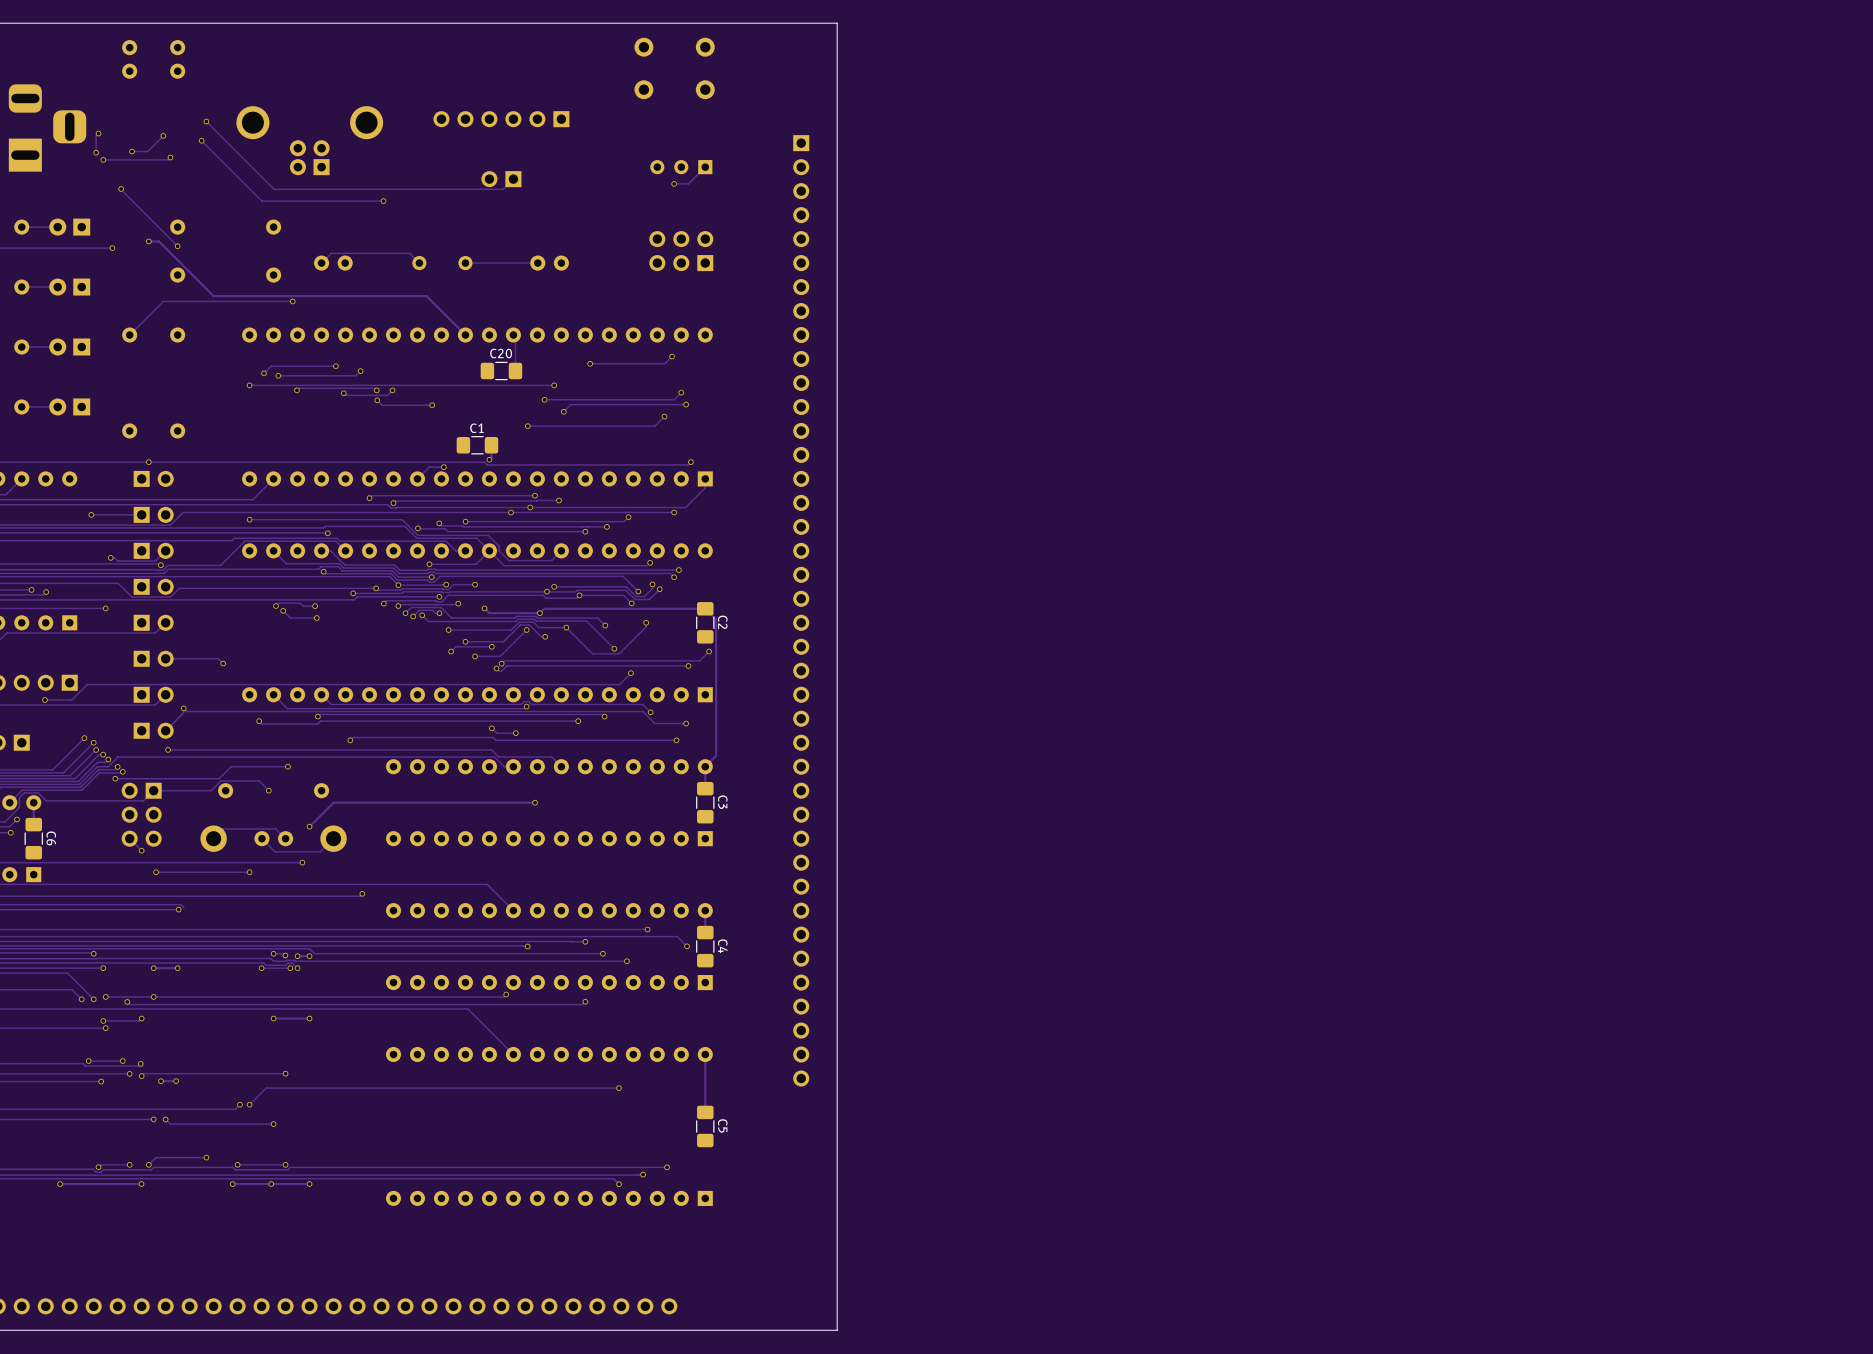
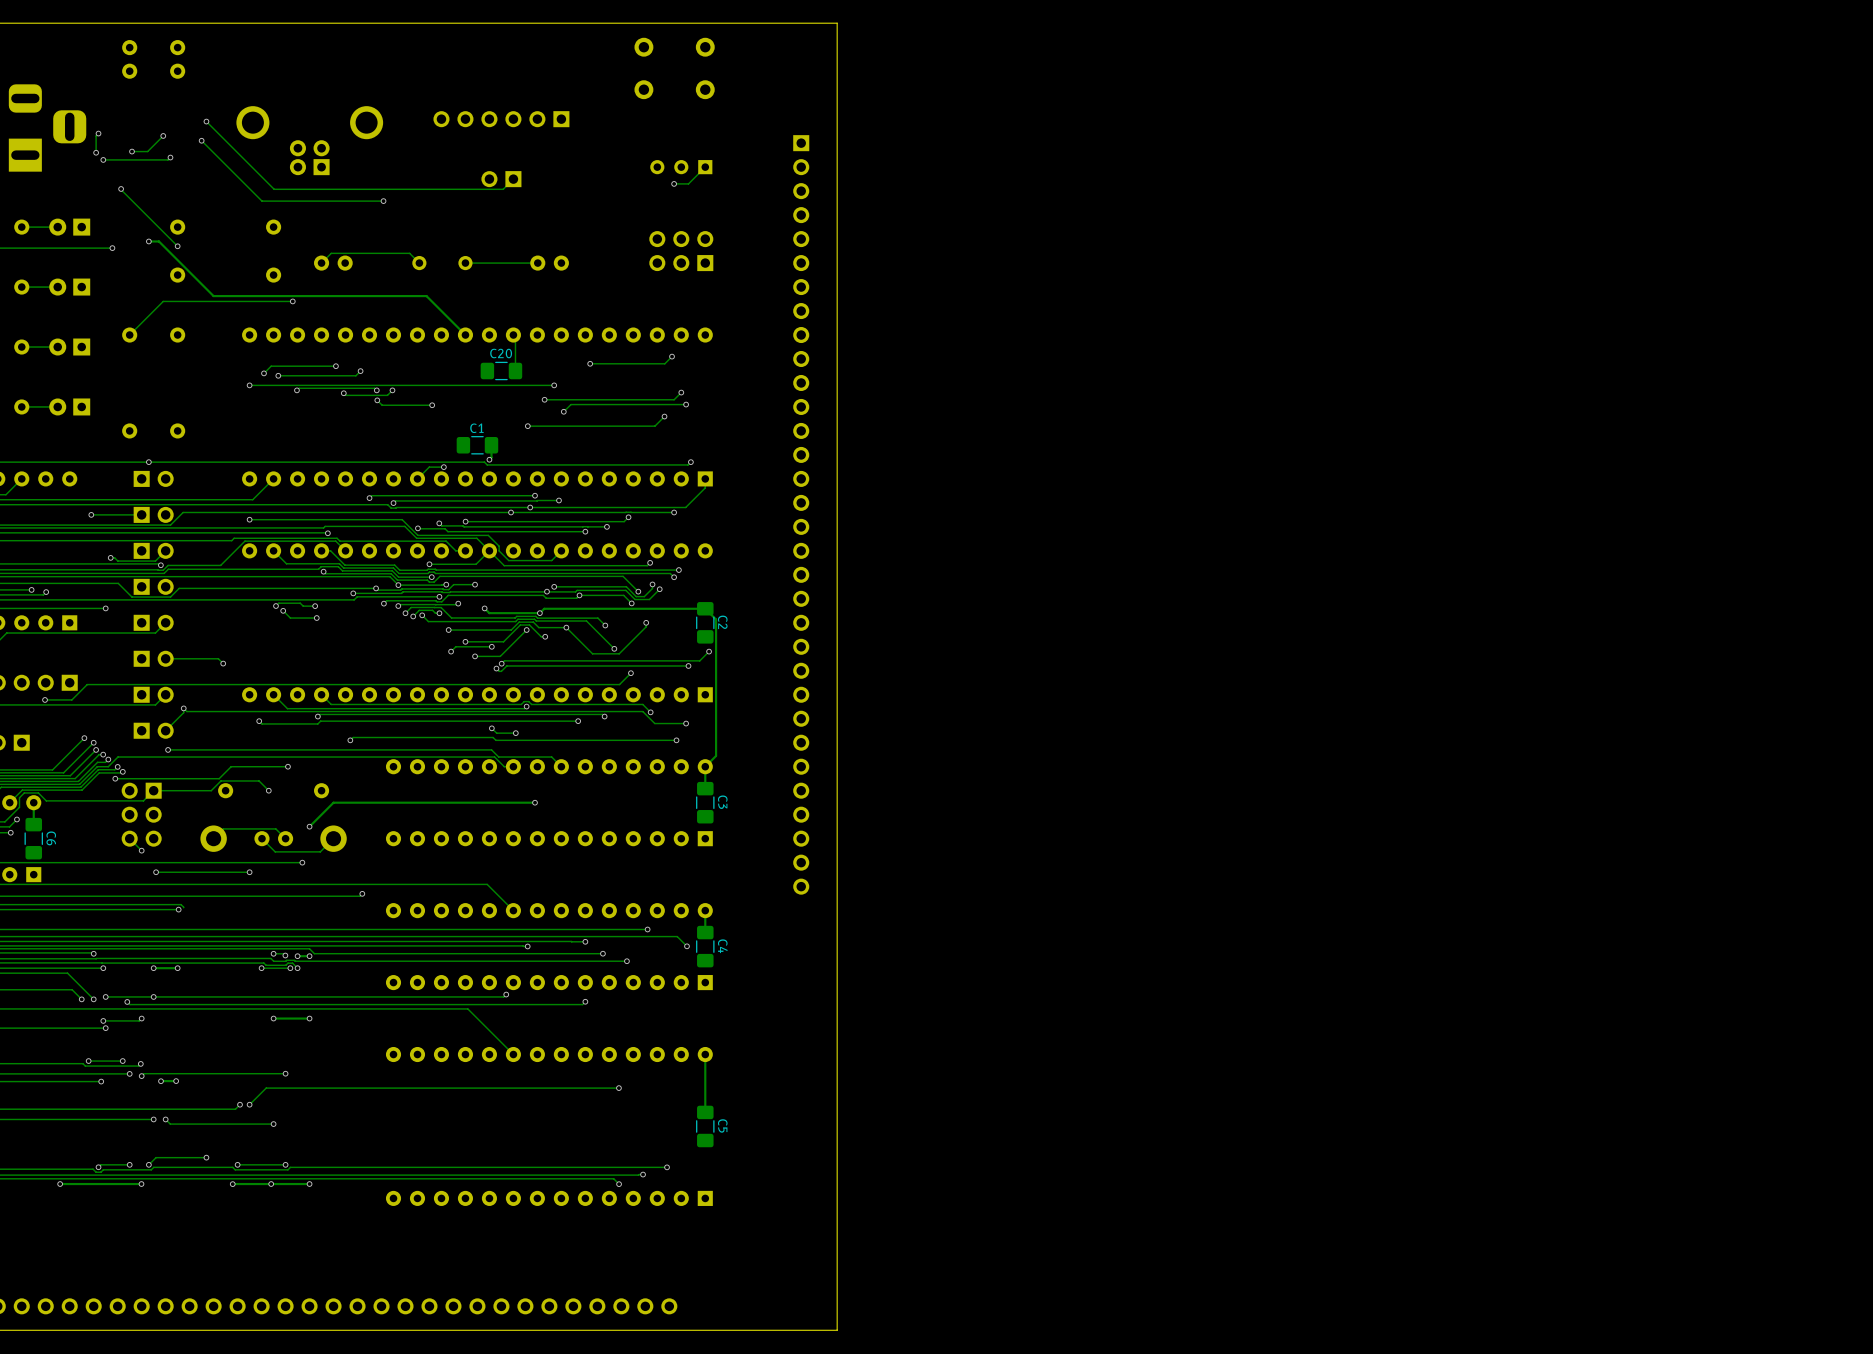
part: (801, 610) -> none

